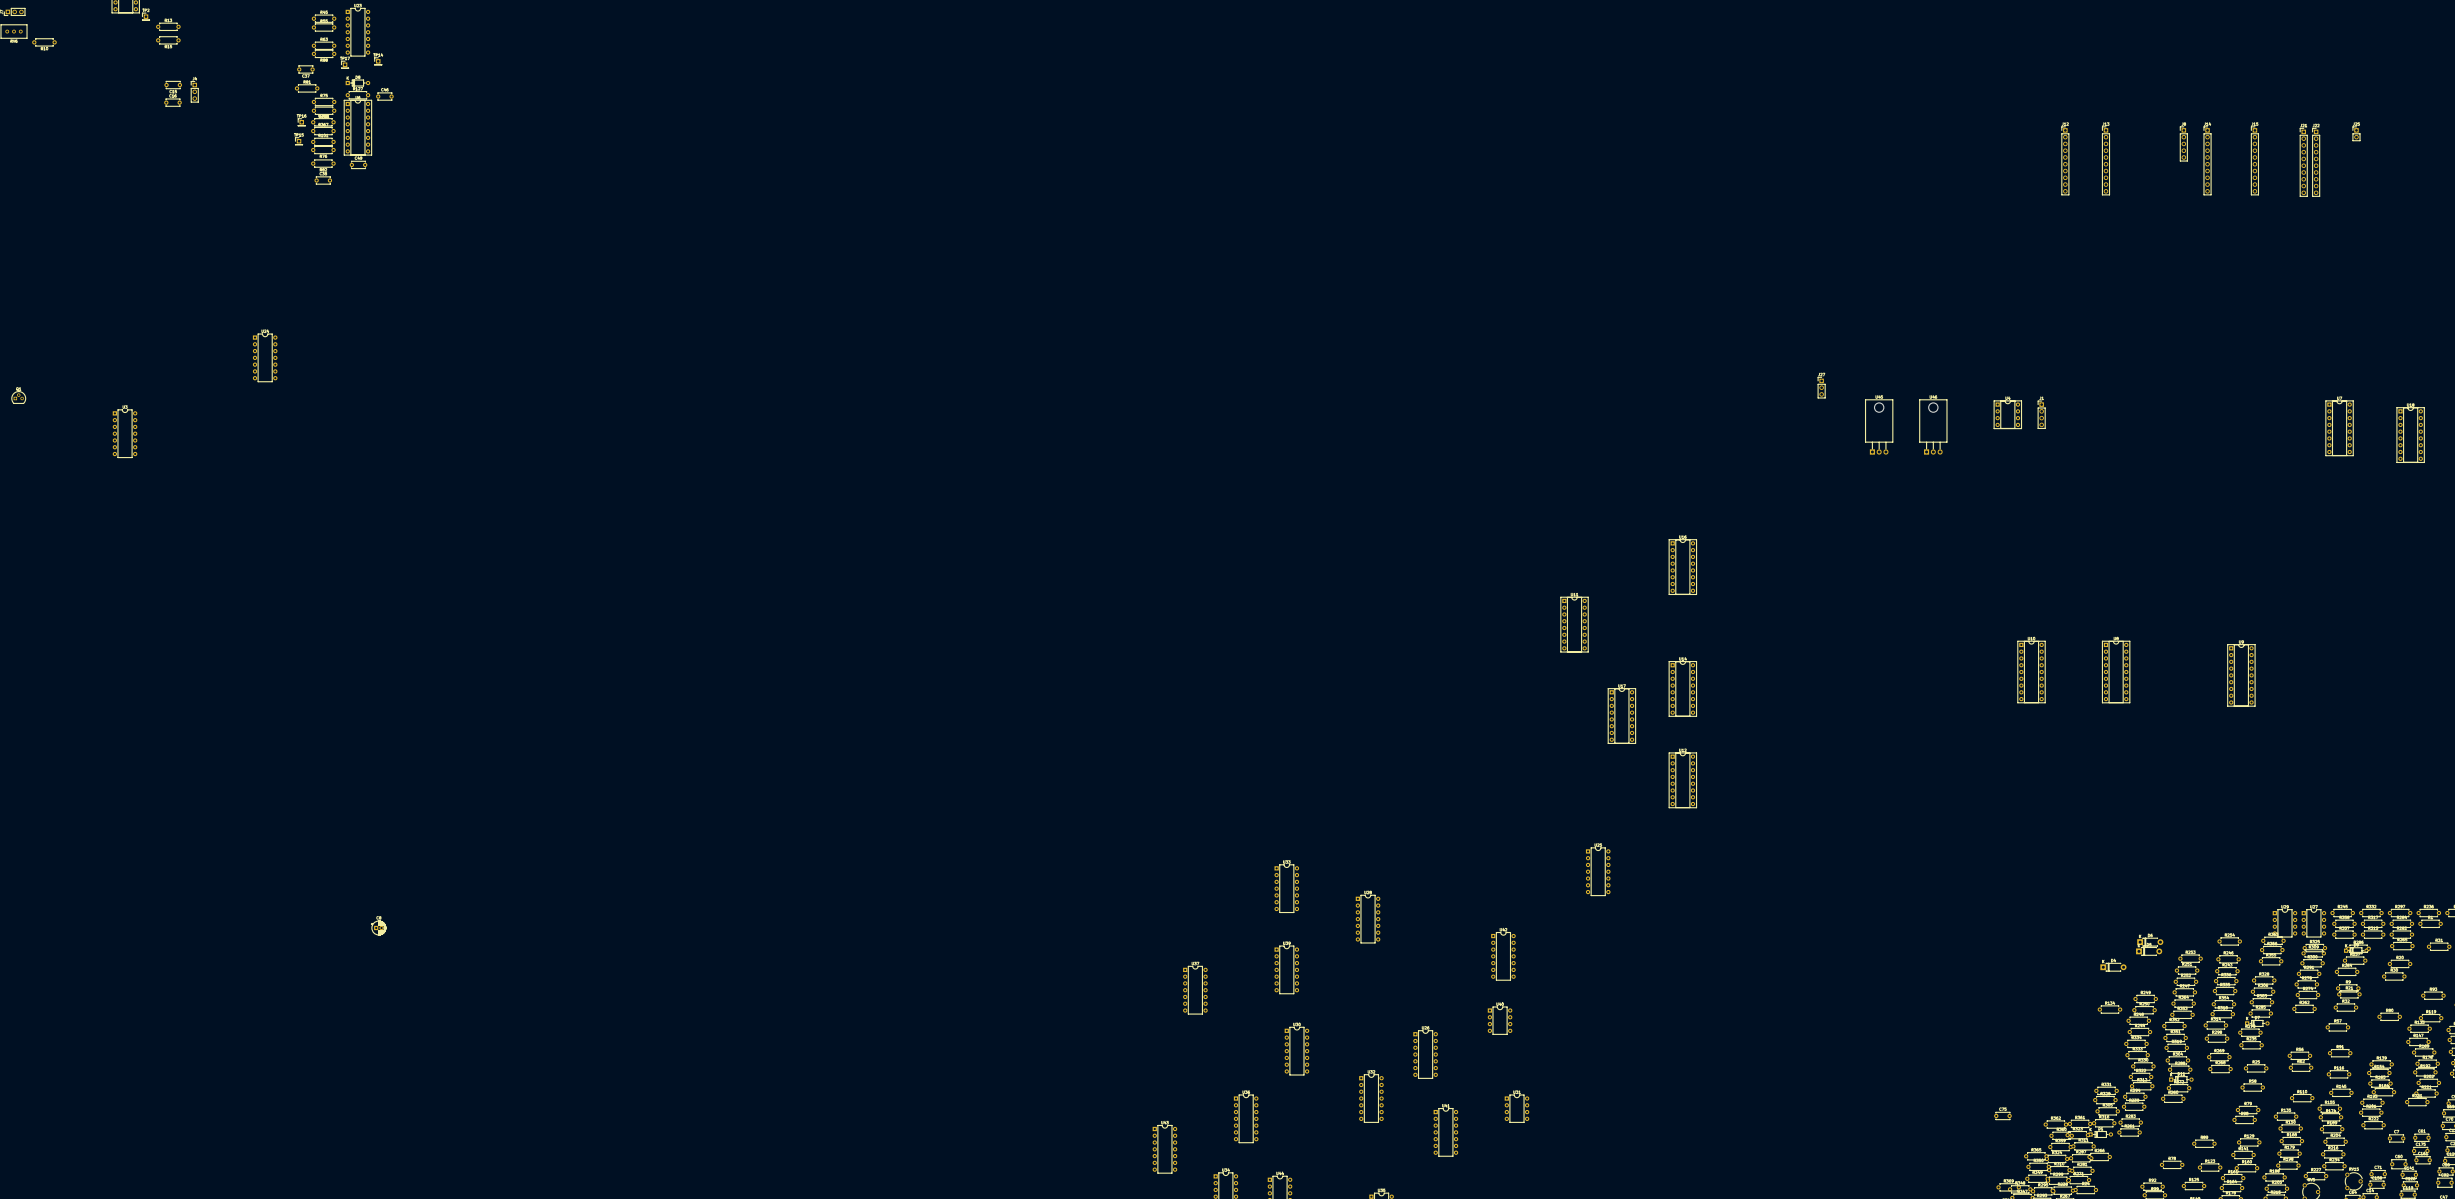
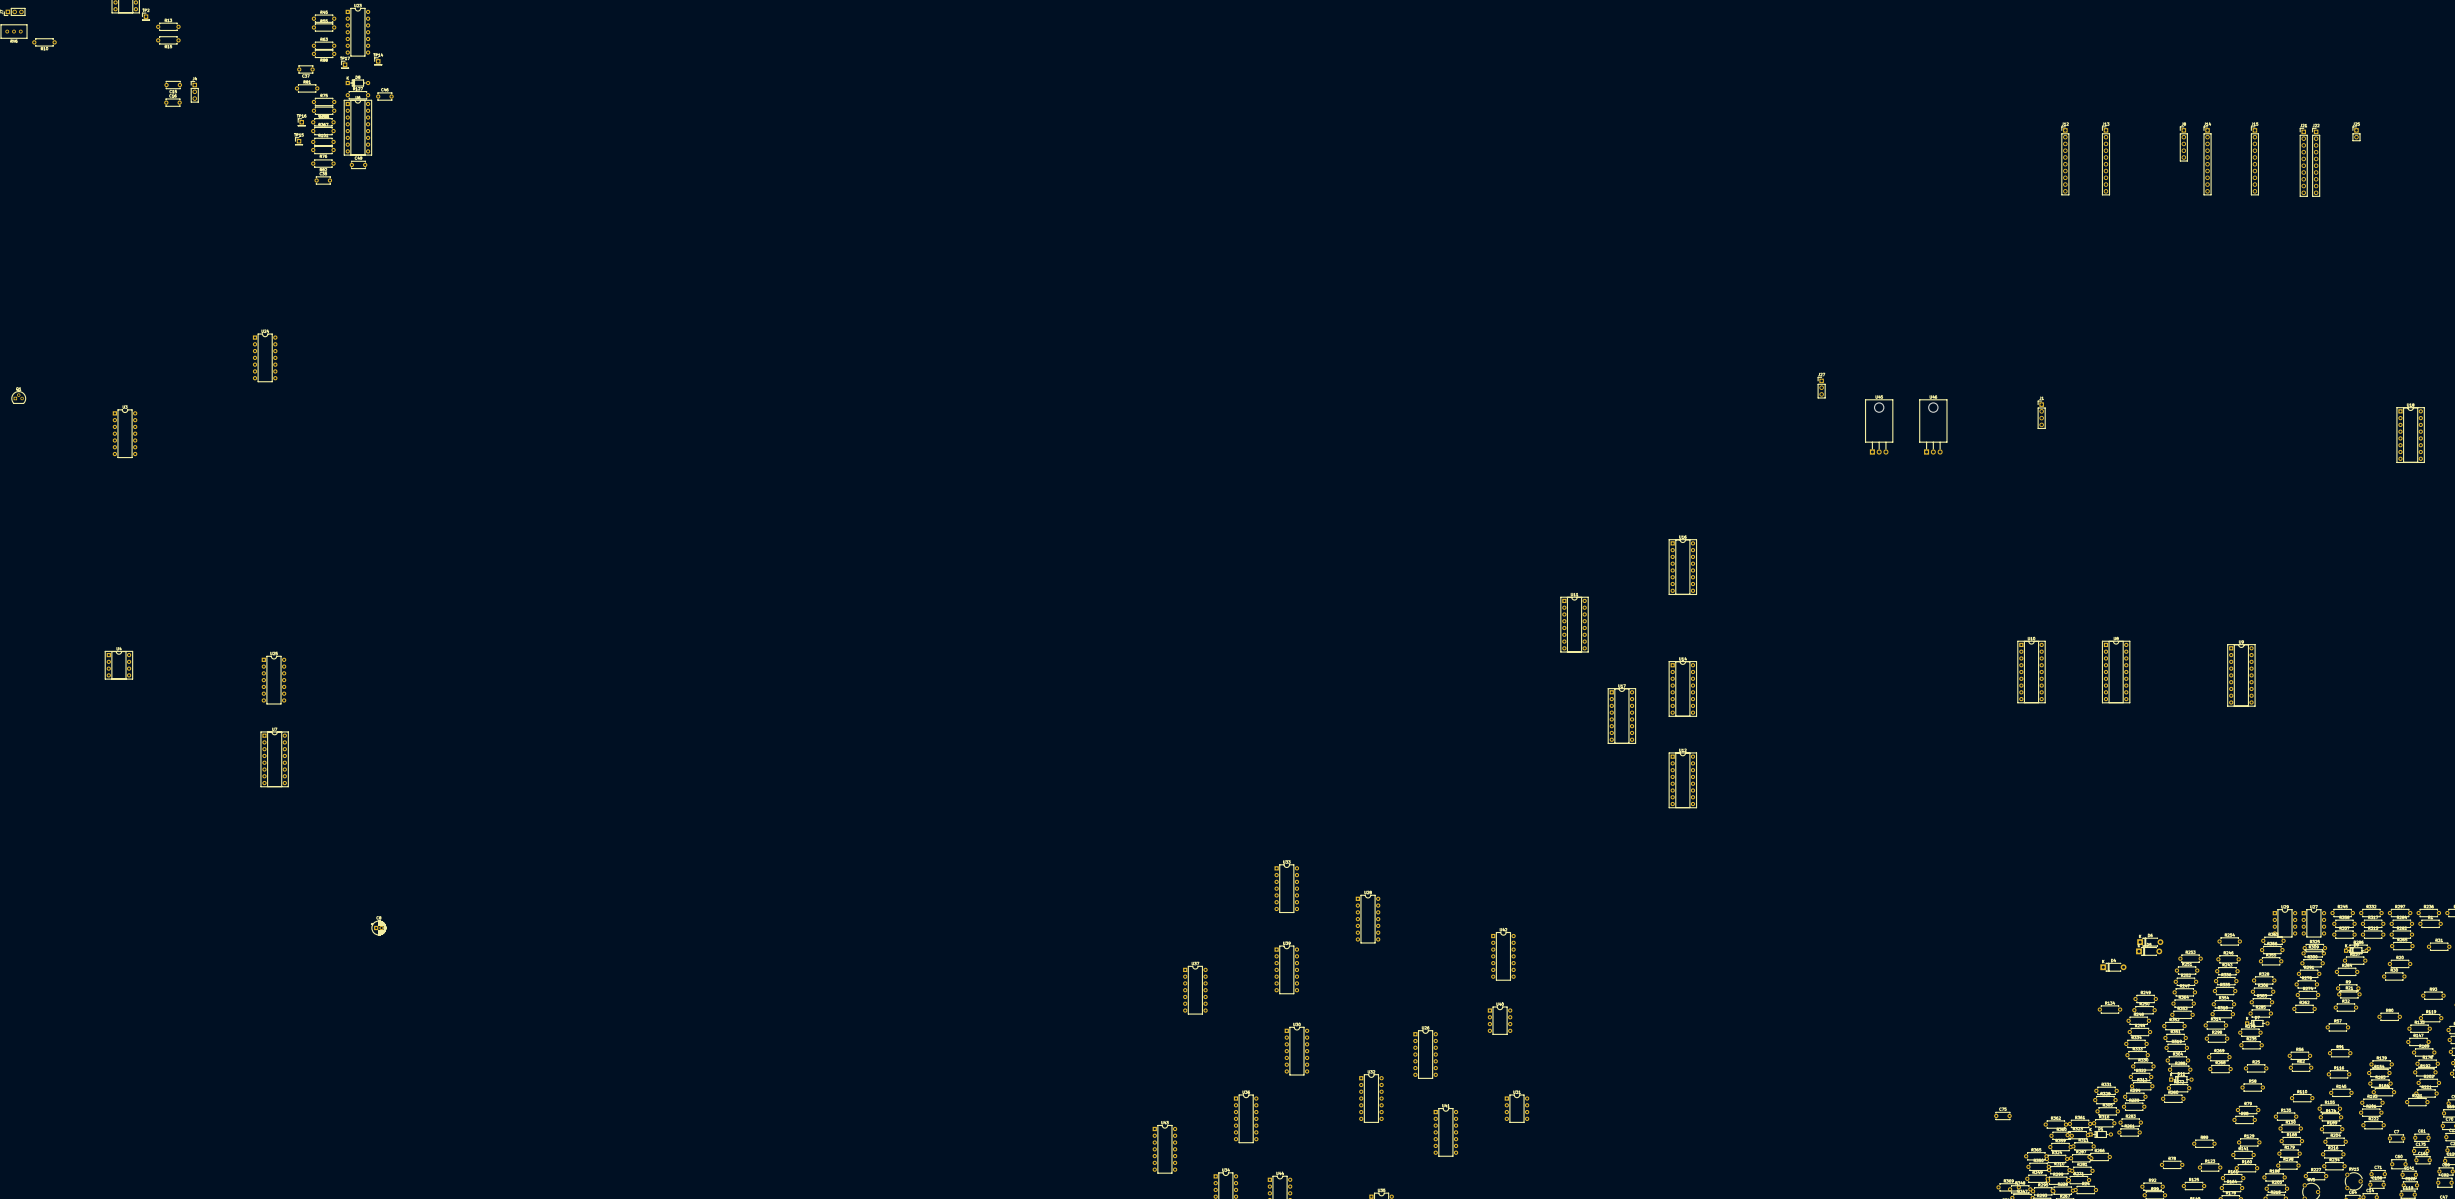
part position: (2007, 414) -> (118, 665)
part position: (2339, 428) -> (274, 759)
part position: (1598, 871) -> (273, 680)

